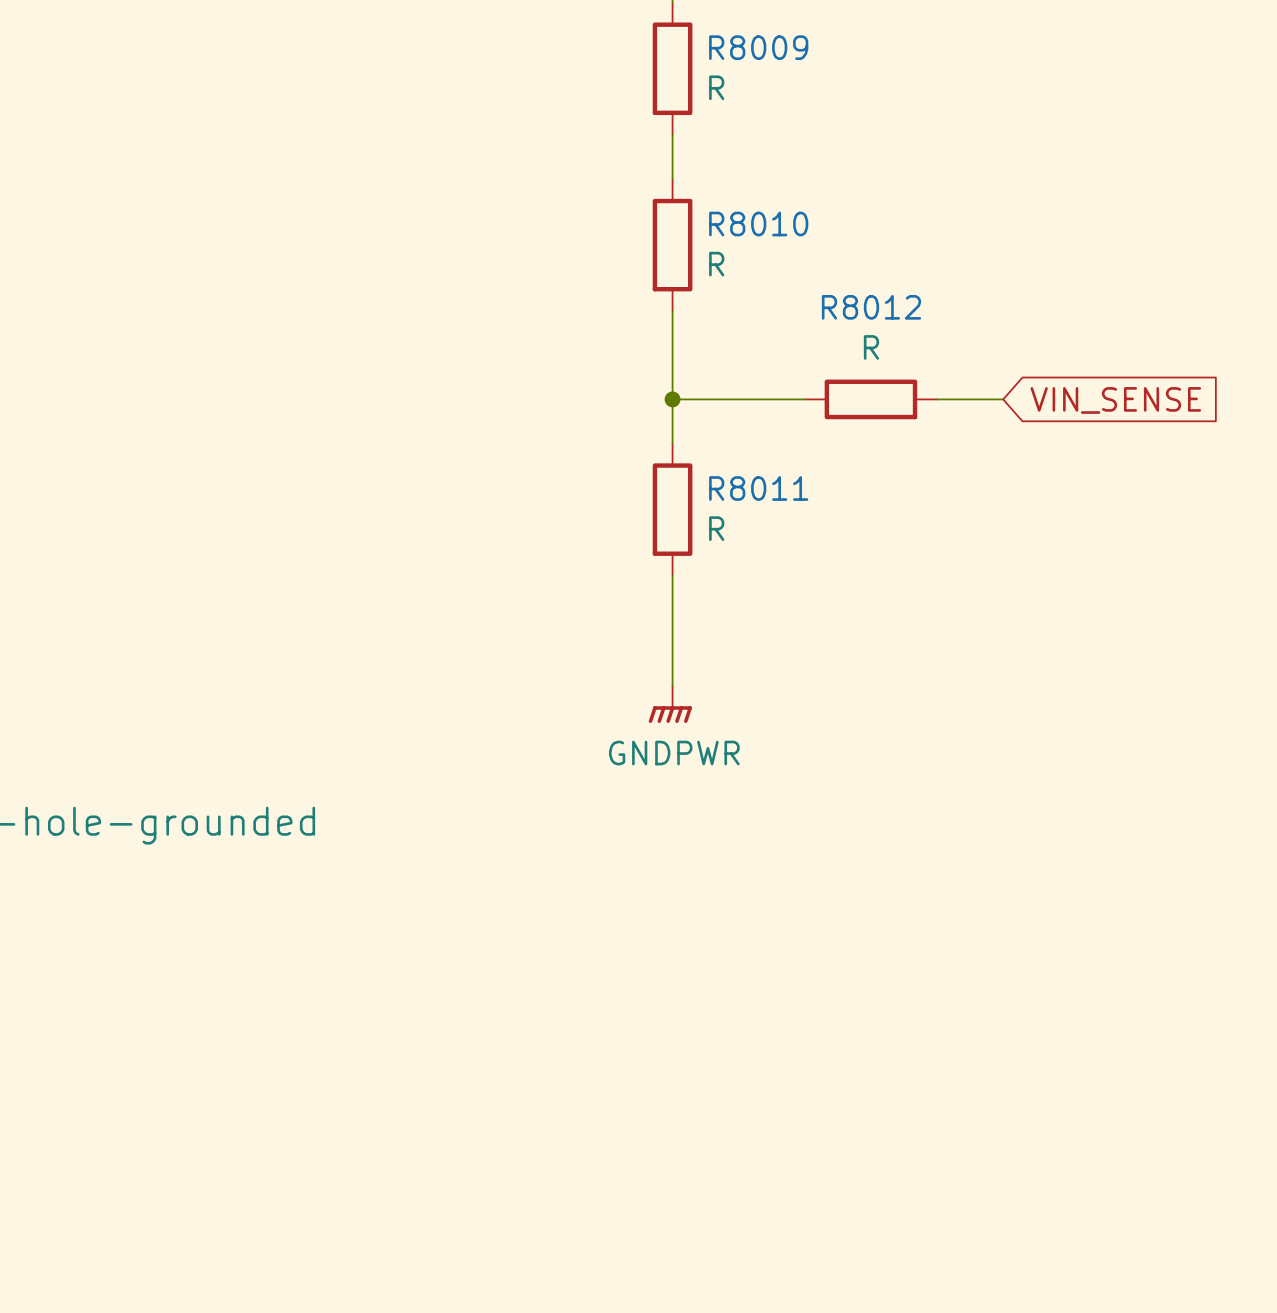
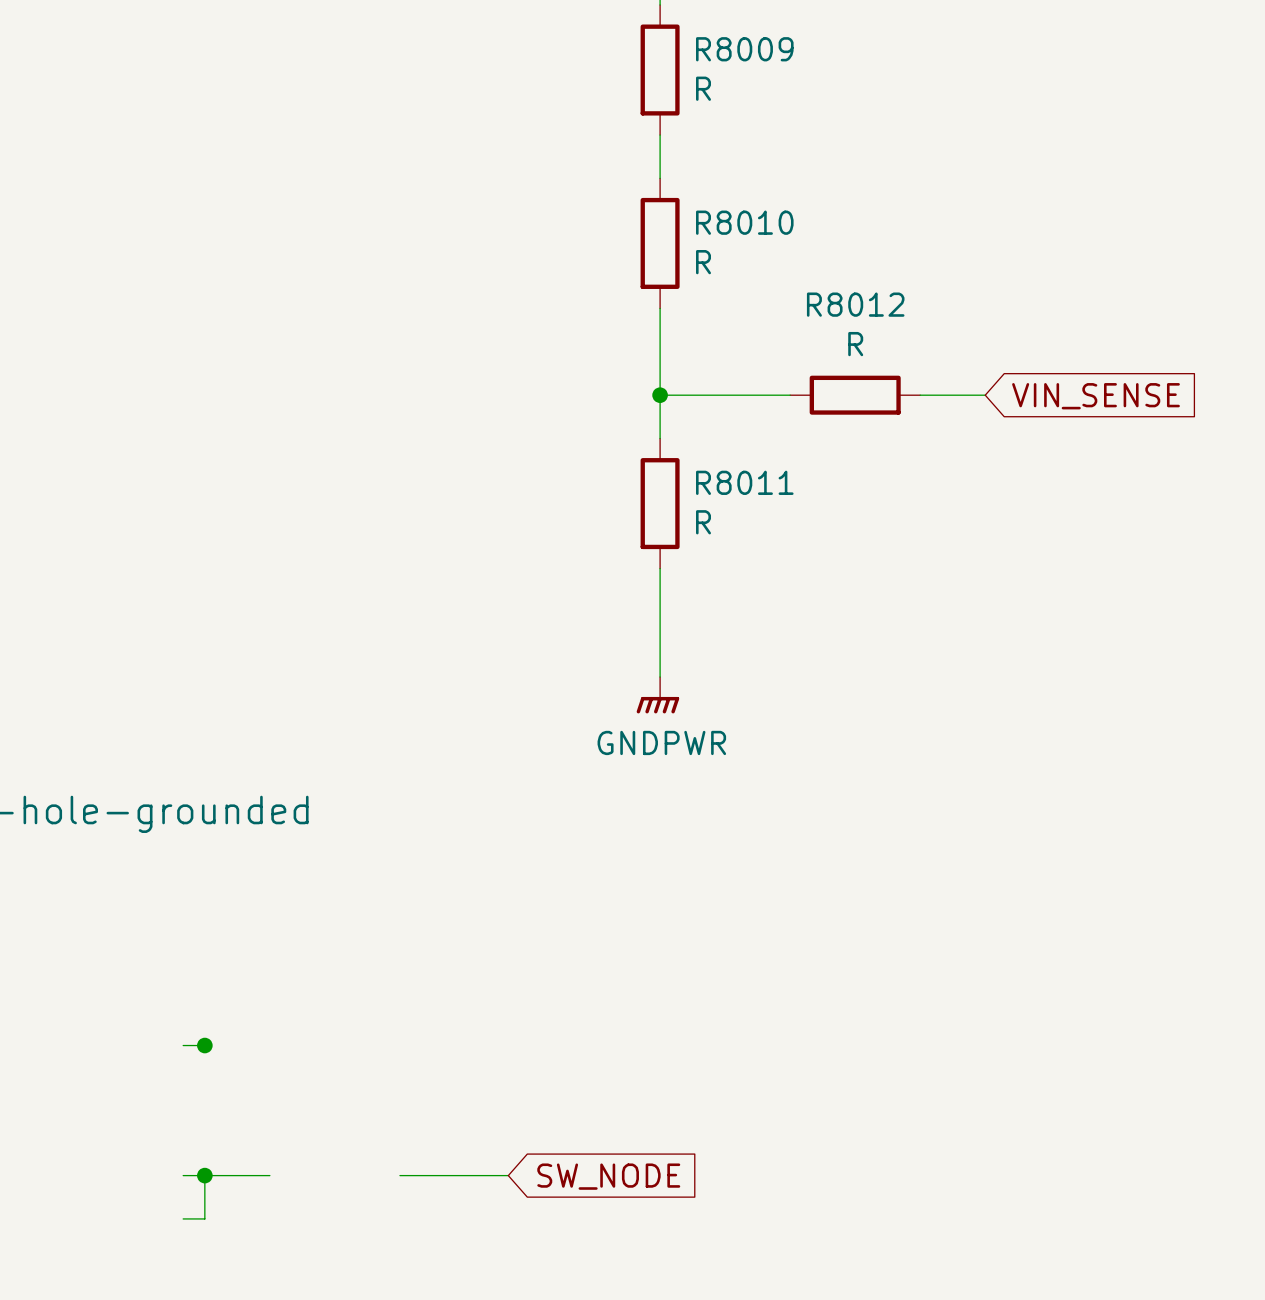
wire: none -> (183, 1045) (204, 1045)
junction: none -> (204, 1045)
wire: none -> (183, 1175) (269, 1175)
wire: none -> (204, 1175) (204, 1218) (183, 1218)
junction: none -> (204, 1175)
wire: none -> (399, 1175) (508, 1175)
global label: none -> SW_NODE (608, 1176)

